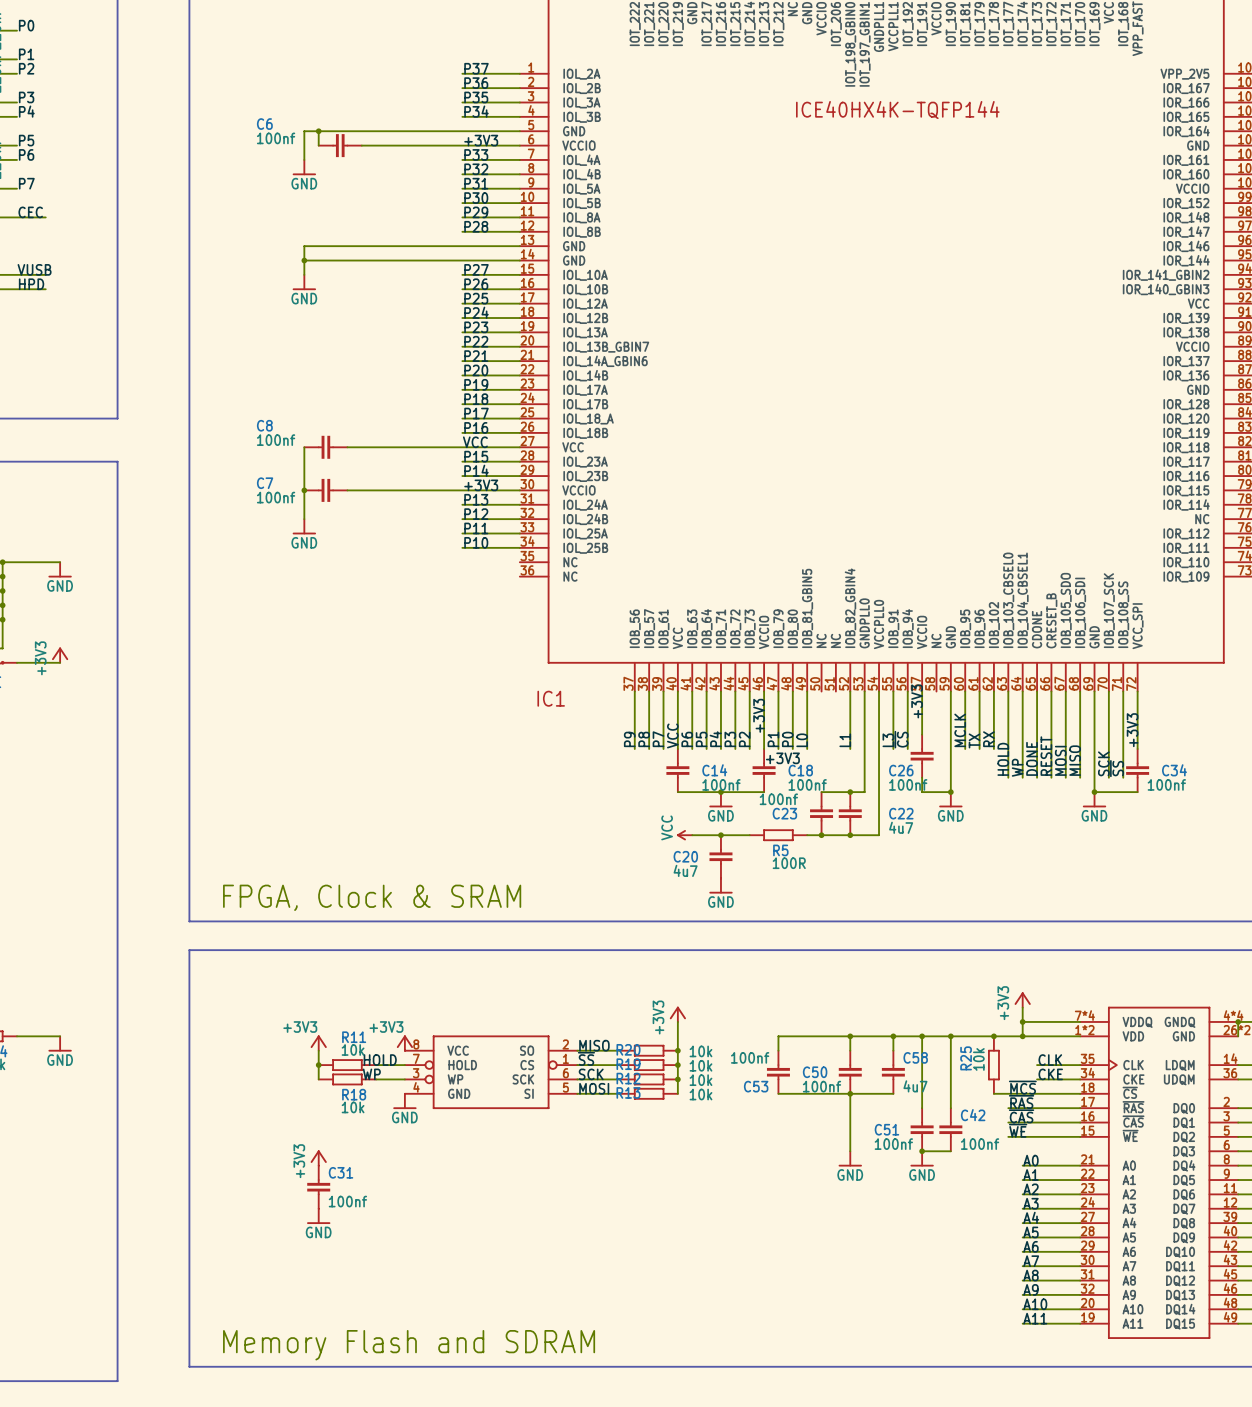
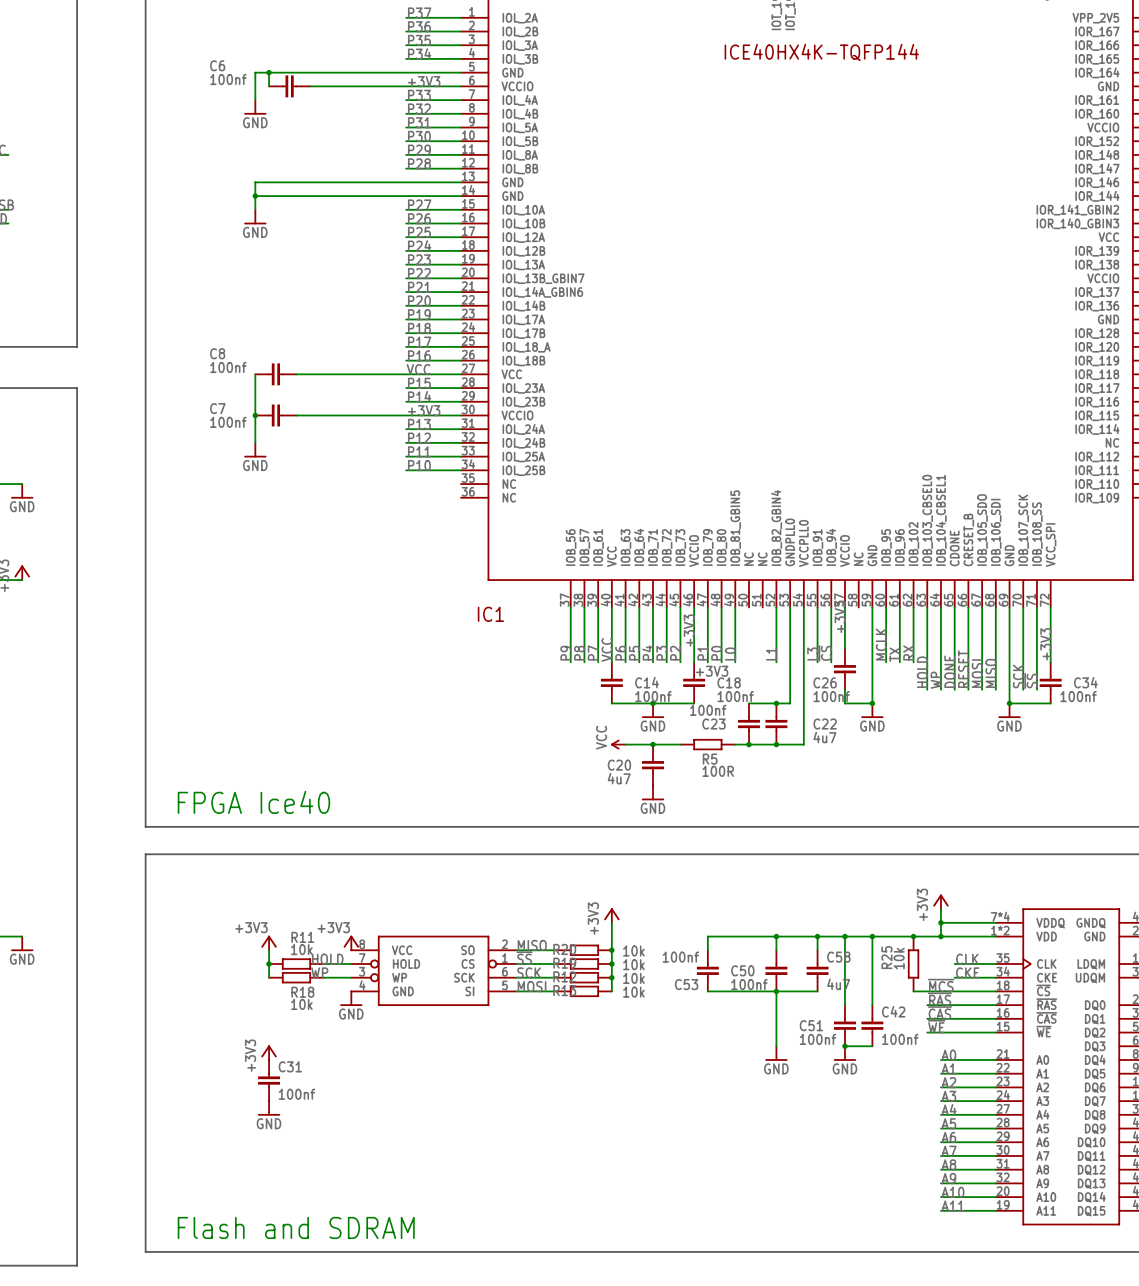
text: FPGA, Clock & SRAM (372, 897) -> FPGA Ice40 (253, 802)
text: Memory Flash and SDRAM (409, 1345) -> Flash and SDRAM (296, 1227)

